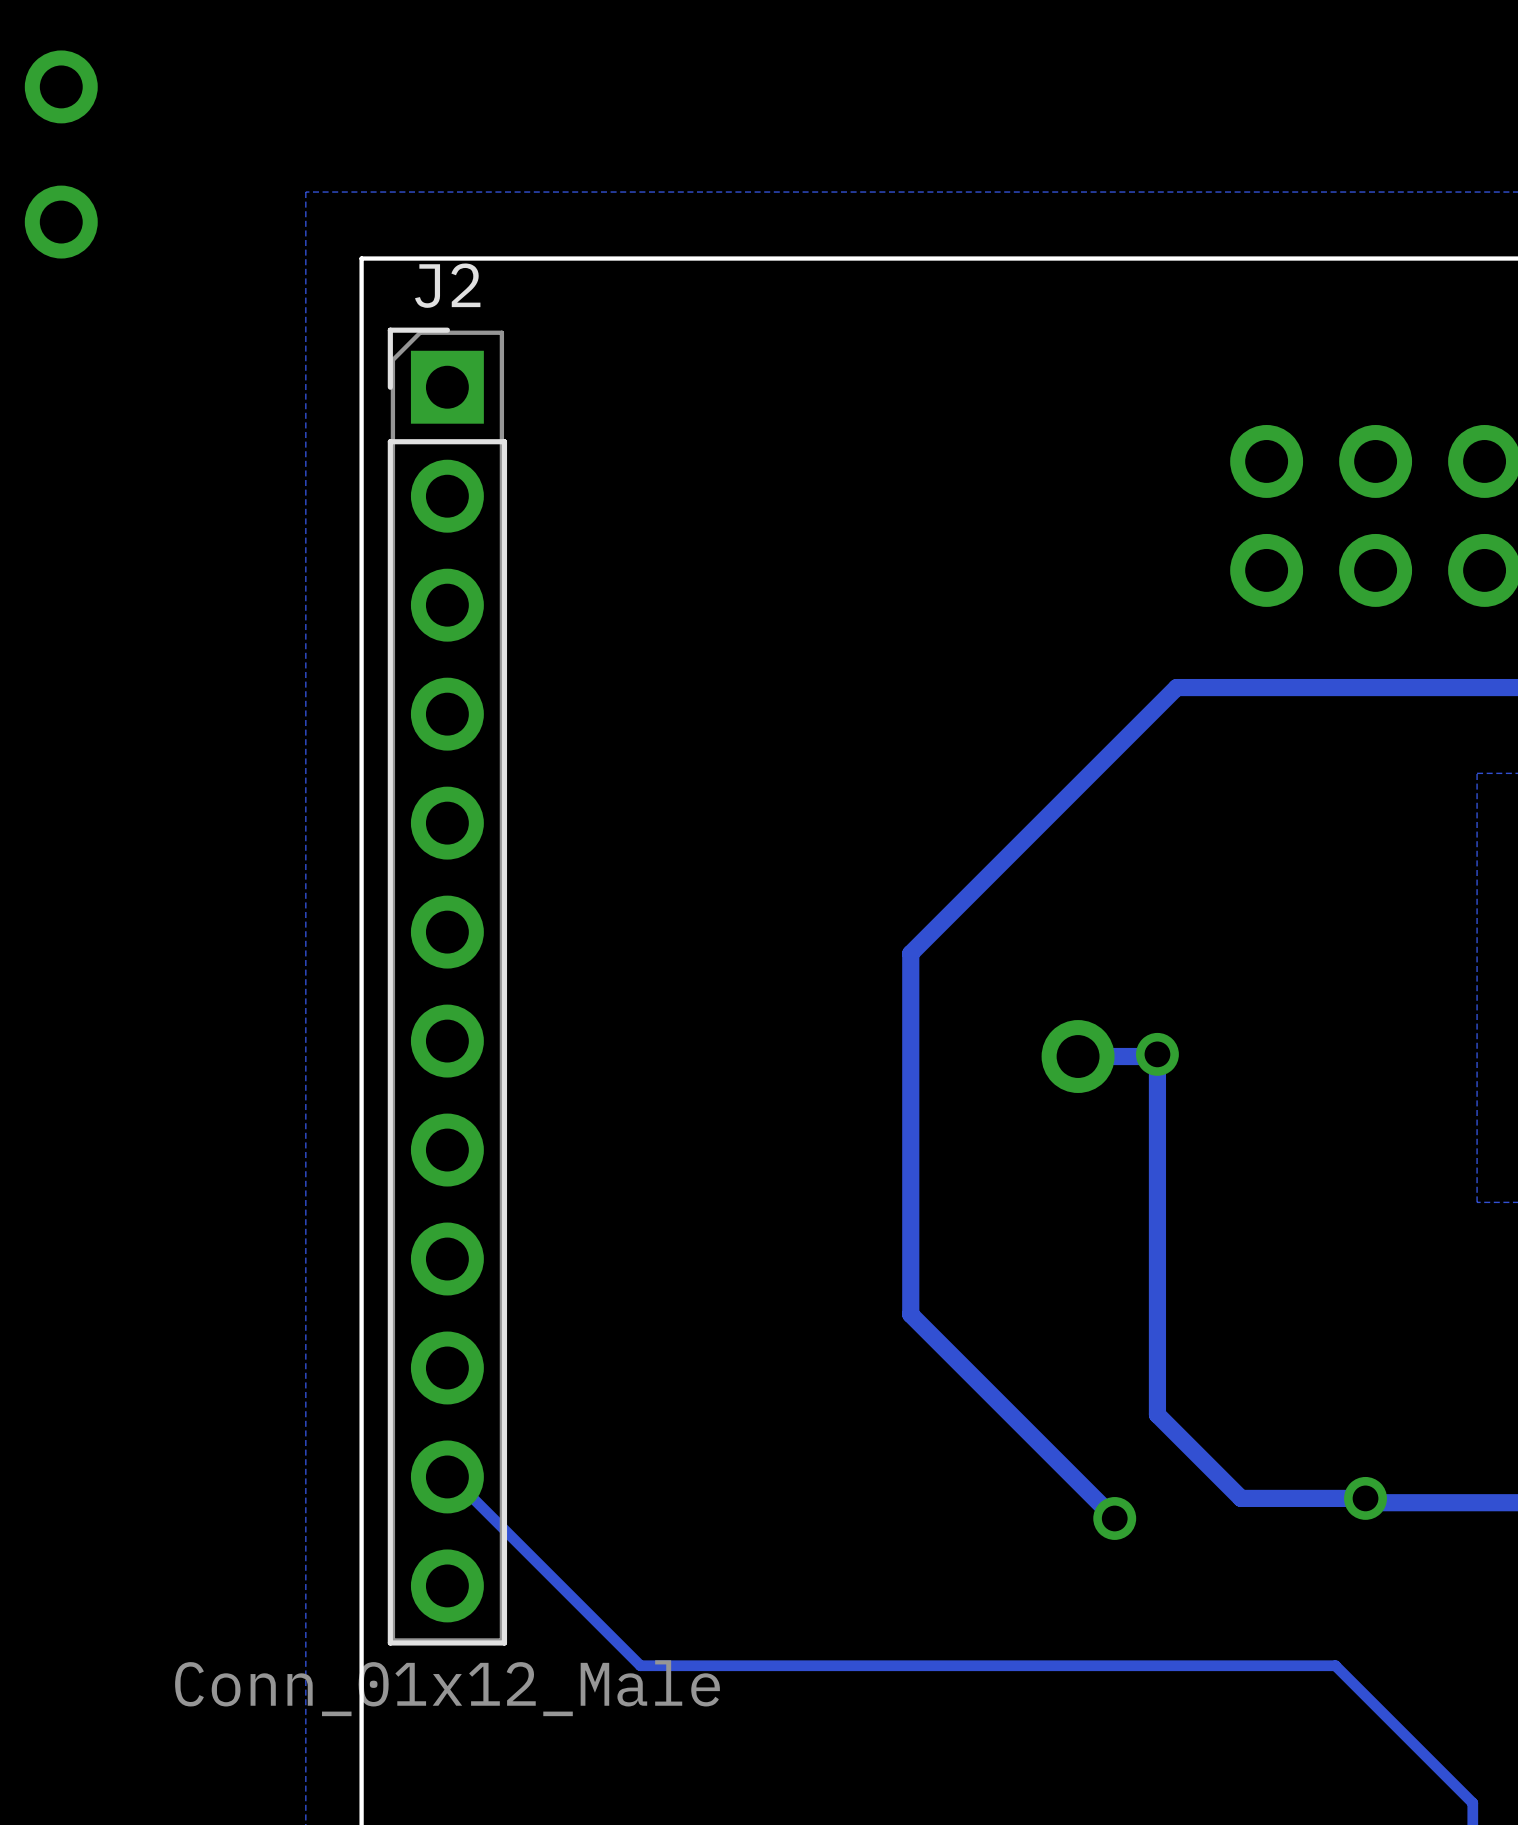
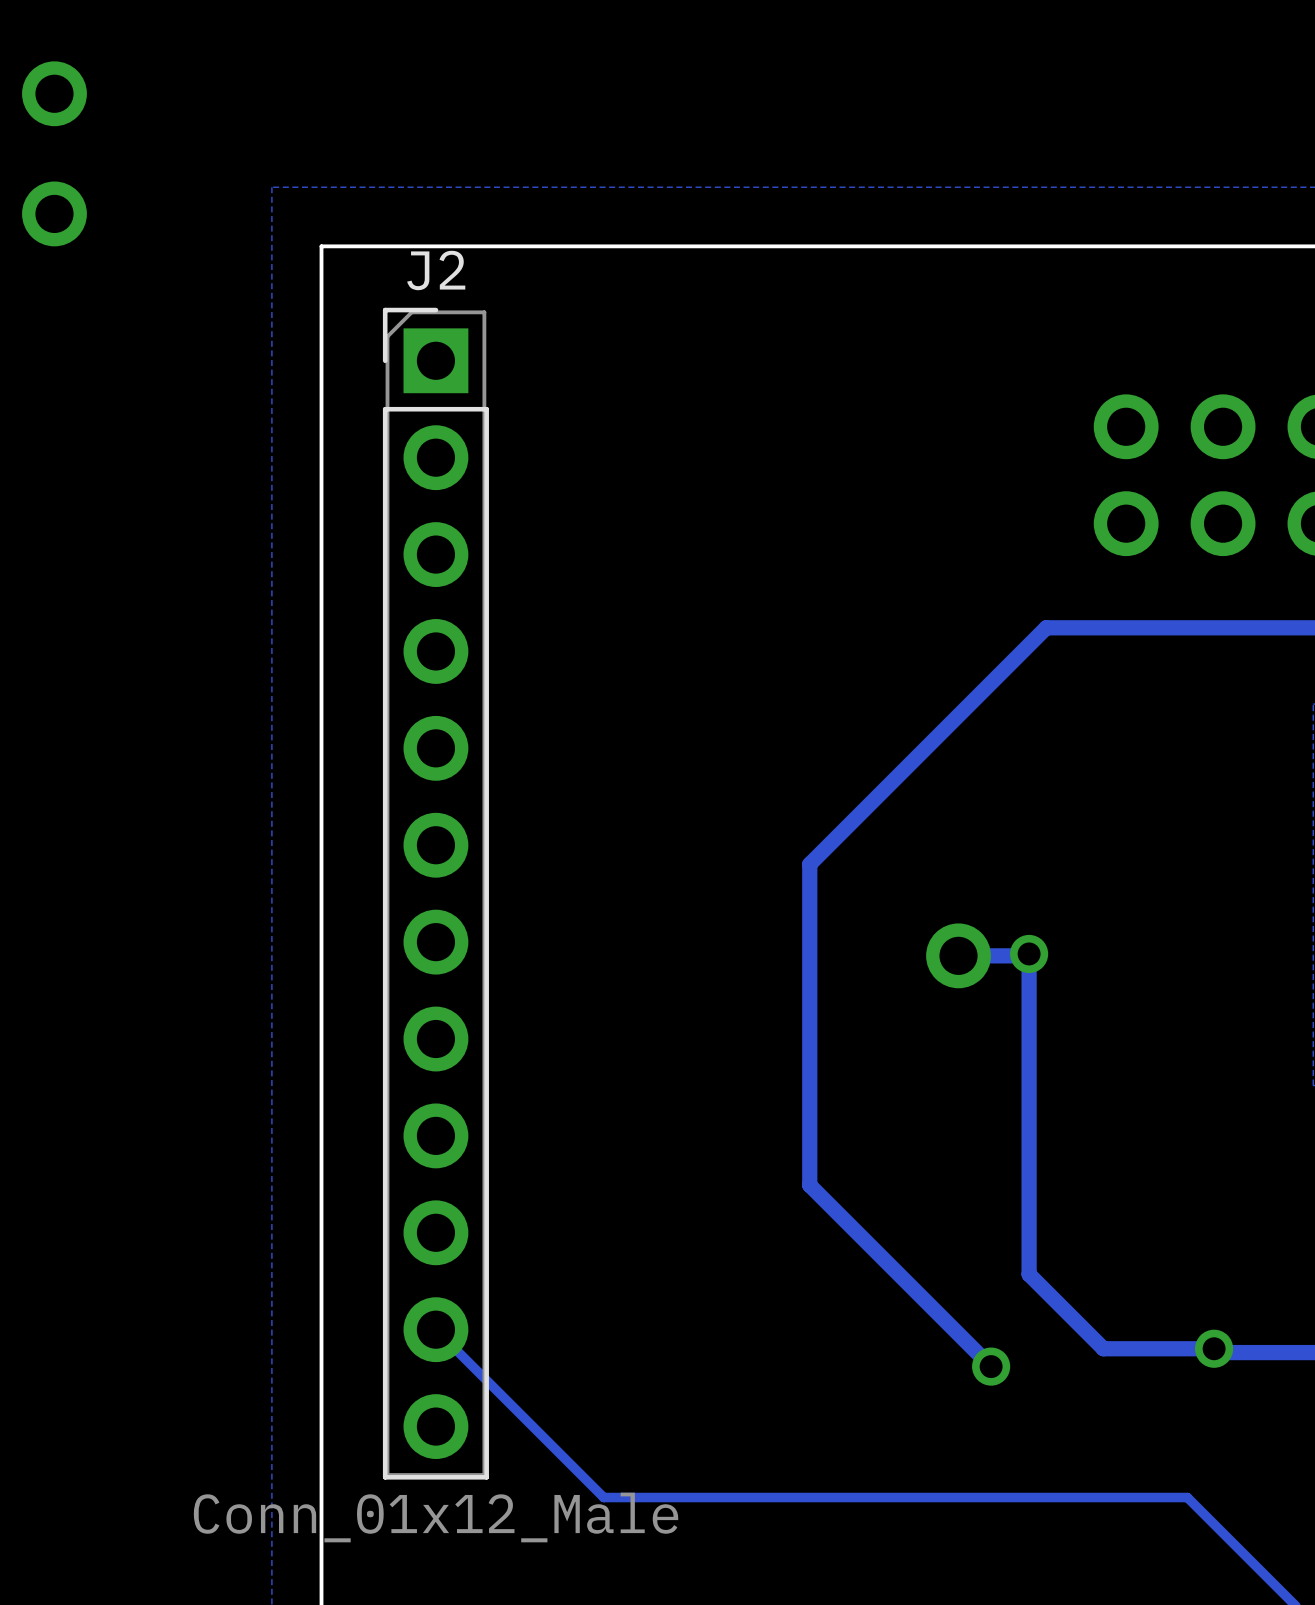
J2 position: (447, 986) -> (435, 893)
track: (447, 1476) (451, 1476) (640, 1665) (679, 1665) -> (435, 1329) (603, 1497)

